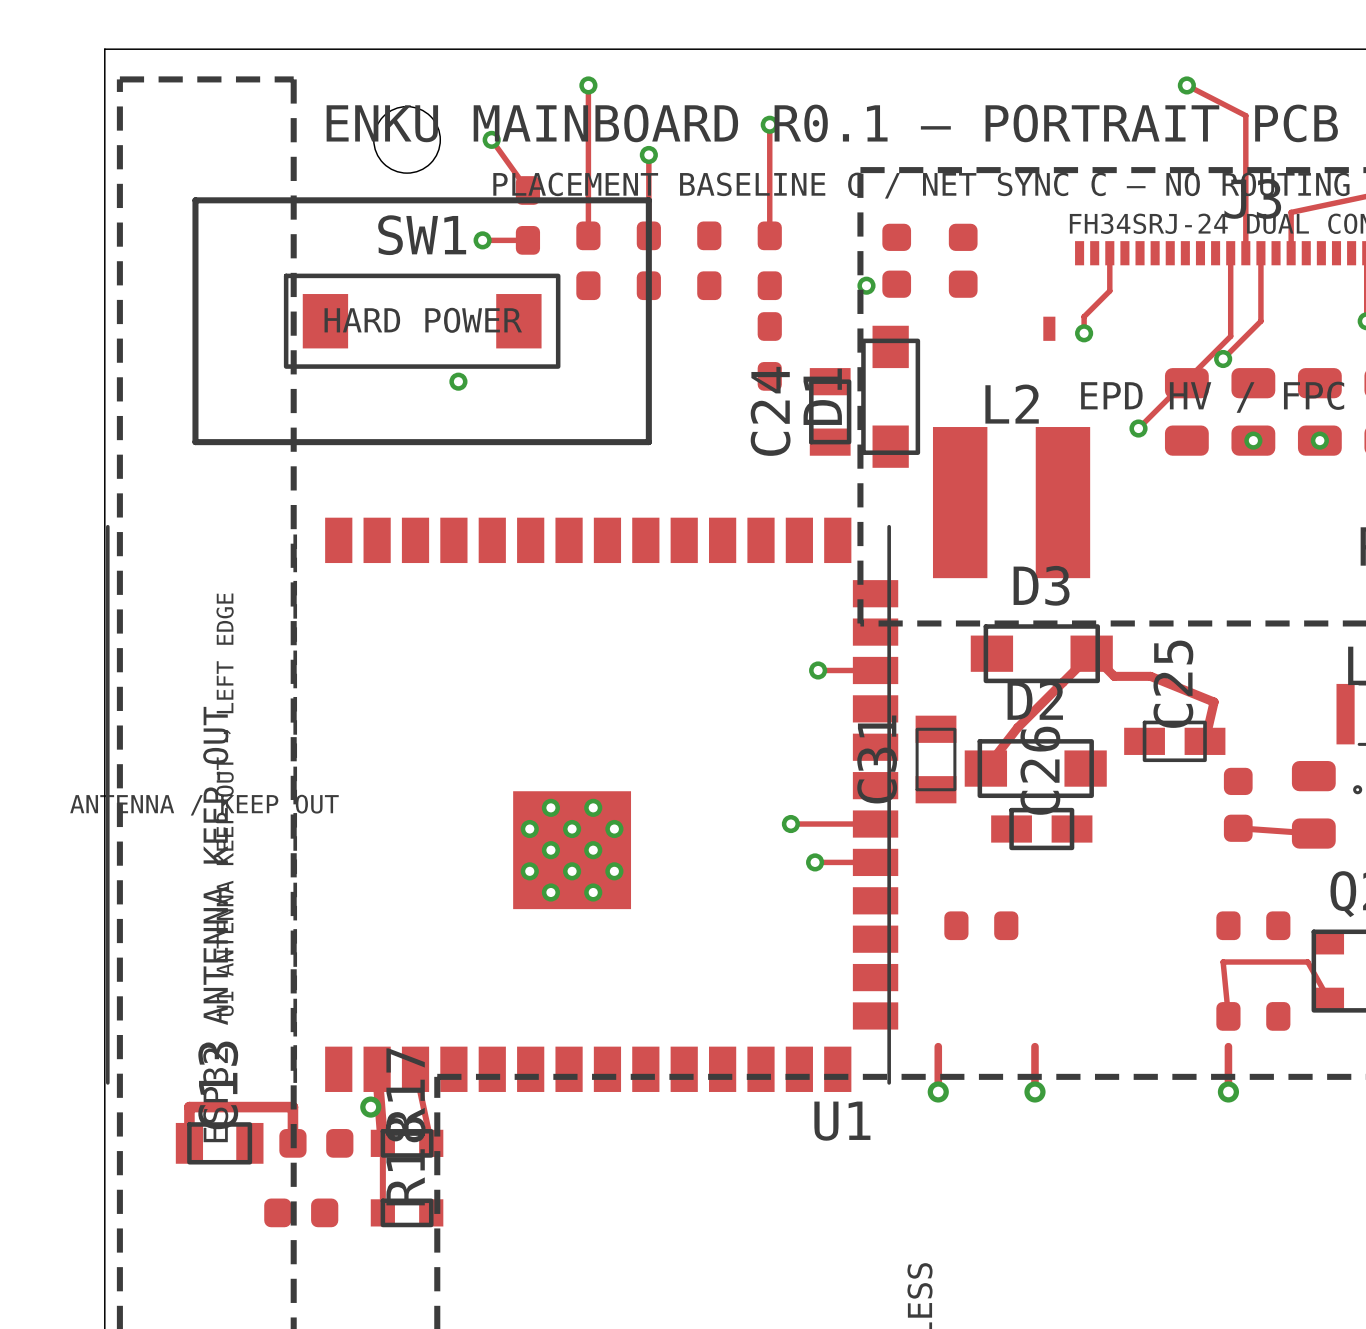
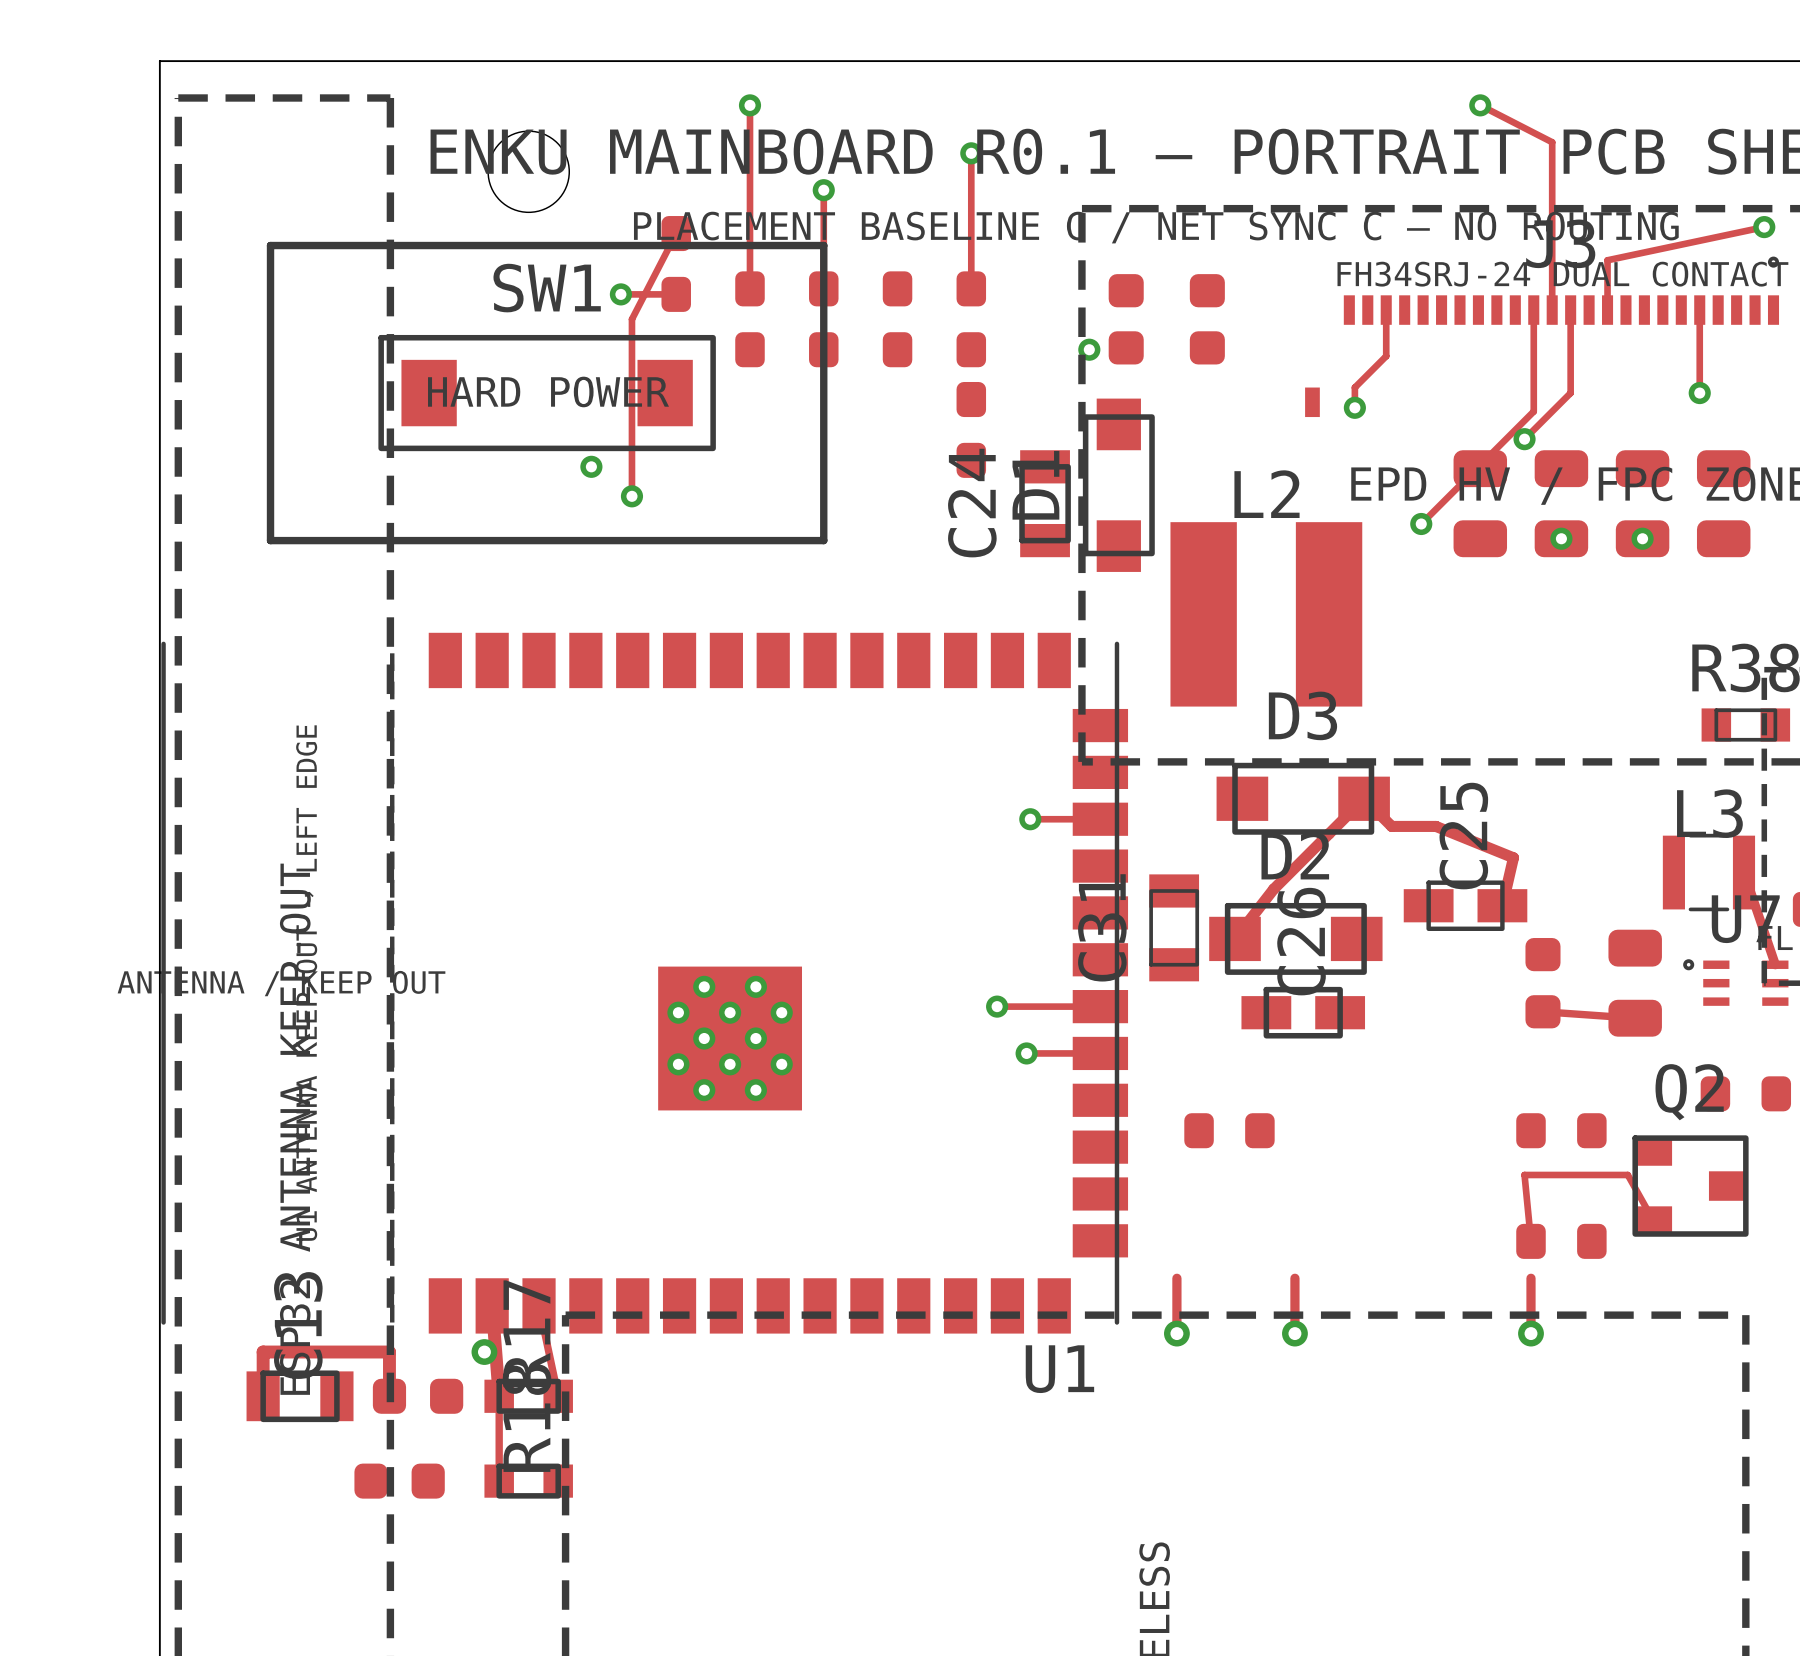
track: (491, 139) (527, 190) -> (631, 496) (631, 319) (676, 233)
via: (491, 139) -> none
via: none -> (631, 496)

